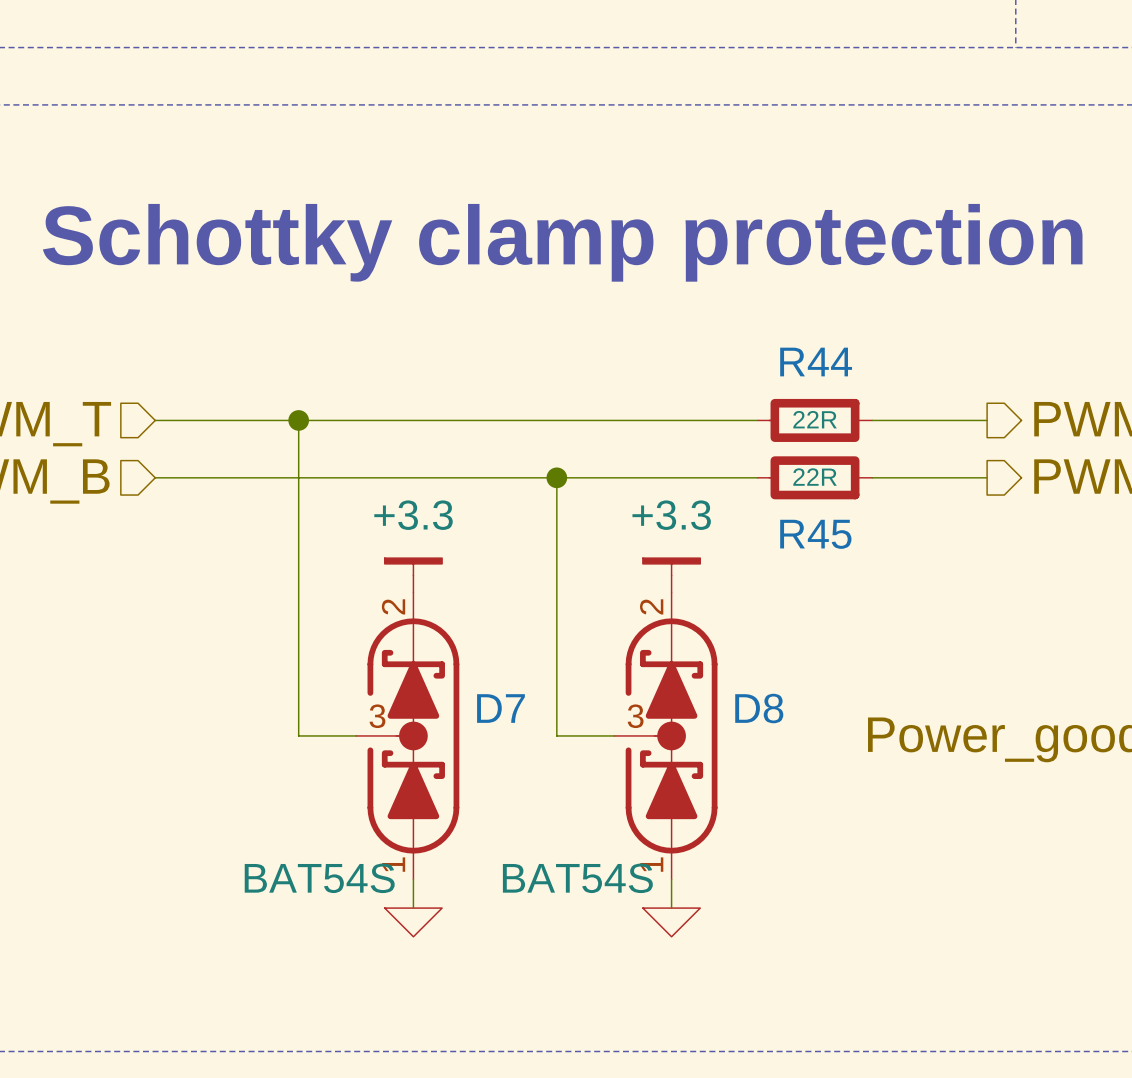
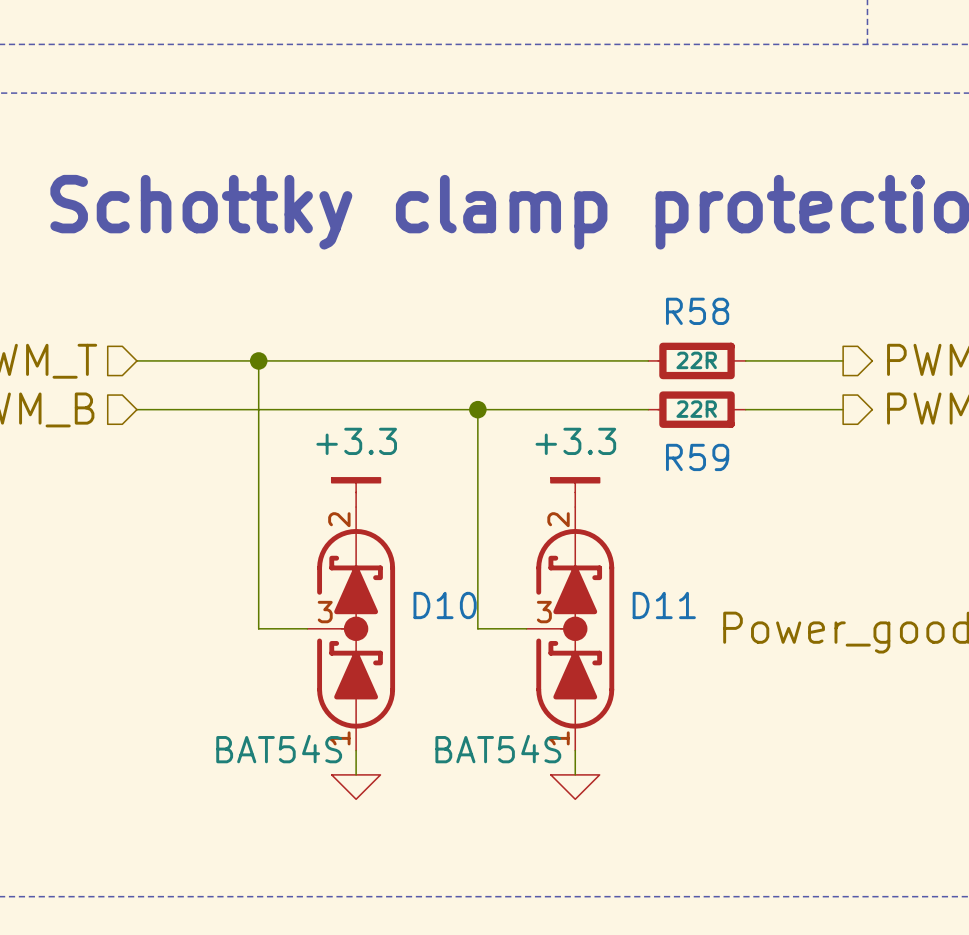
R44 name: R44 (816, 362) -> R58 (697, 311)
R45 name: R45 (815, 534) -> R59 (697, 457)
D7 name: D7 (500, 708) -> D10 (445, 605)
D8 name: D8 (759, 708) -> D11 (664, 605)

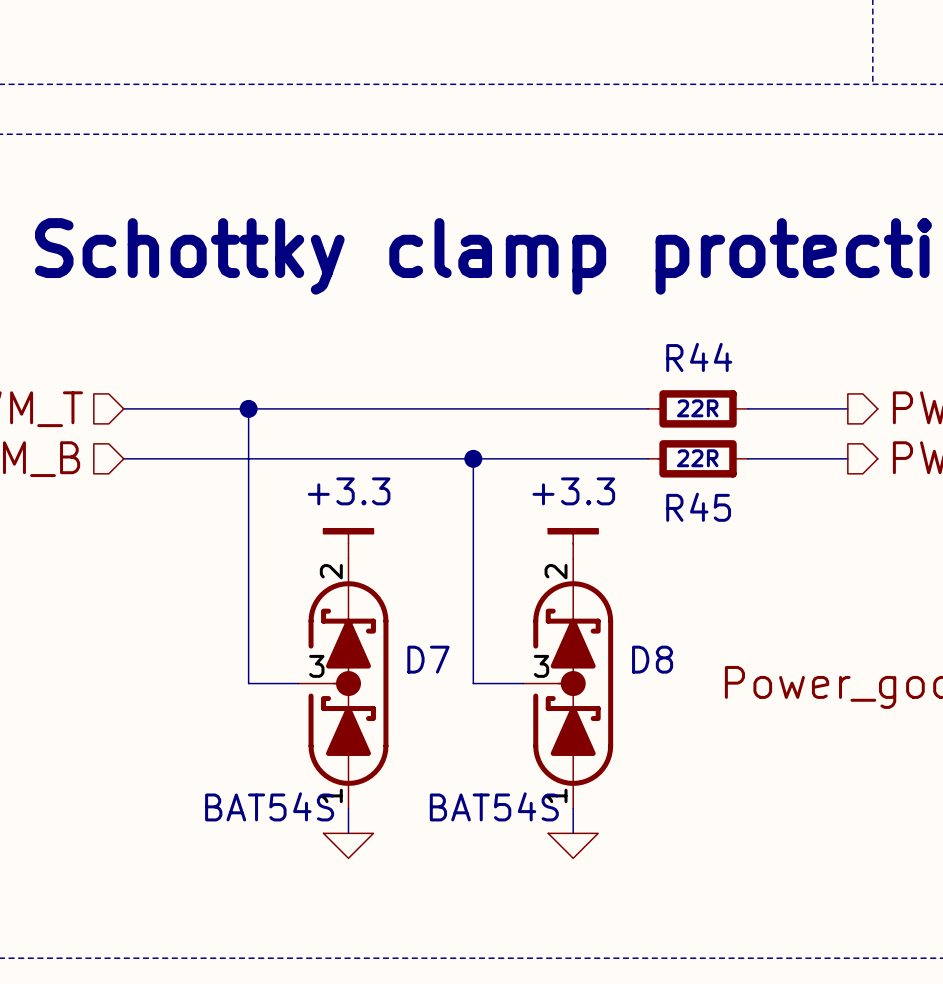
R58 name: R58 (697, 311) -> R44 (699, 357)
R59 name: R59 (697, 457) -> R45 (698, 507)
D10 name: D10 (445, 605) -> D7 (428, 659)
D11 name: D11 (664, 605) -> D8 (652, 659)

